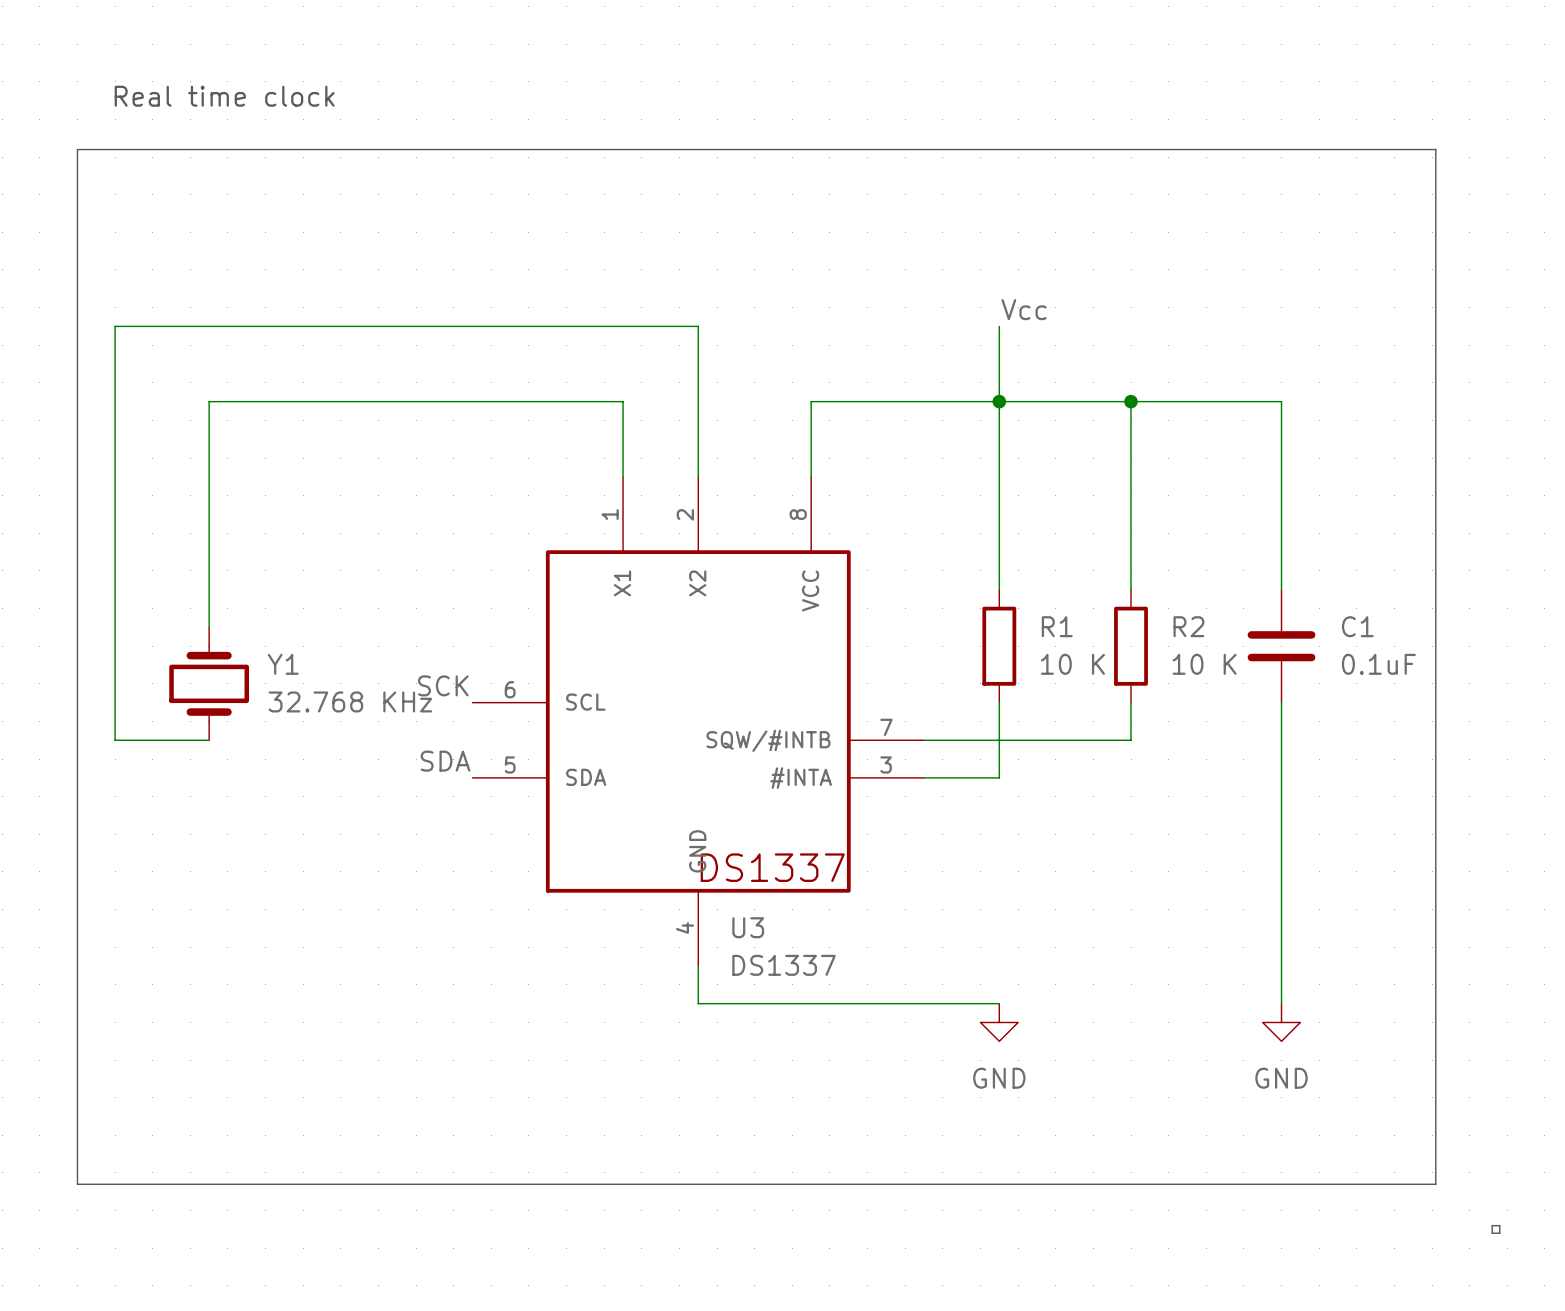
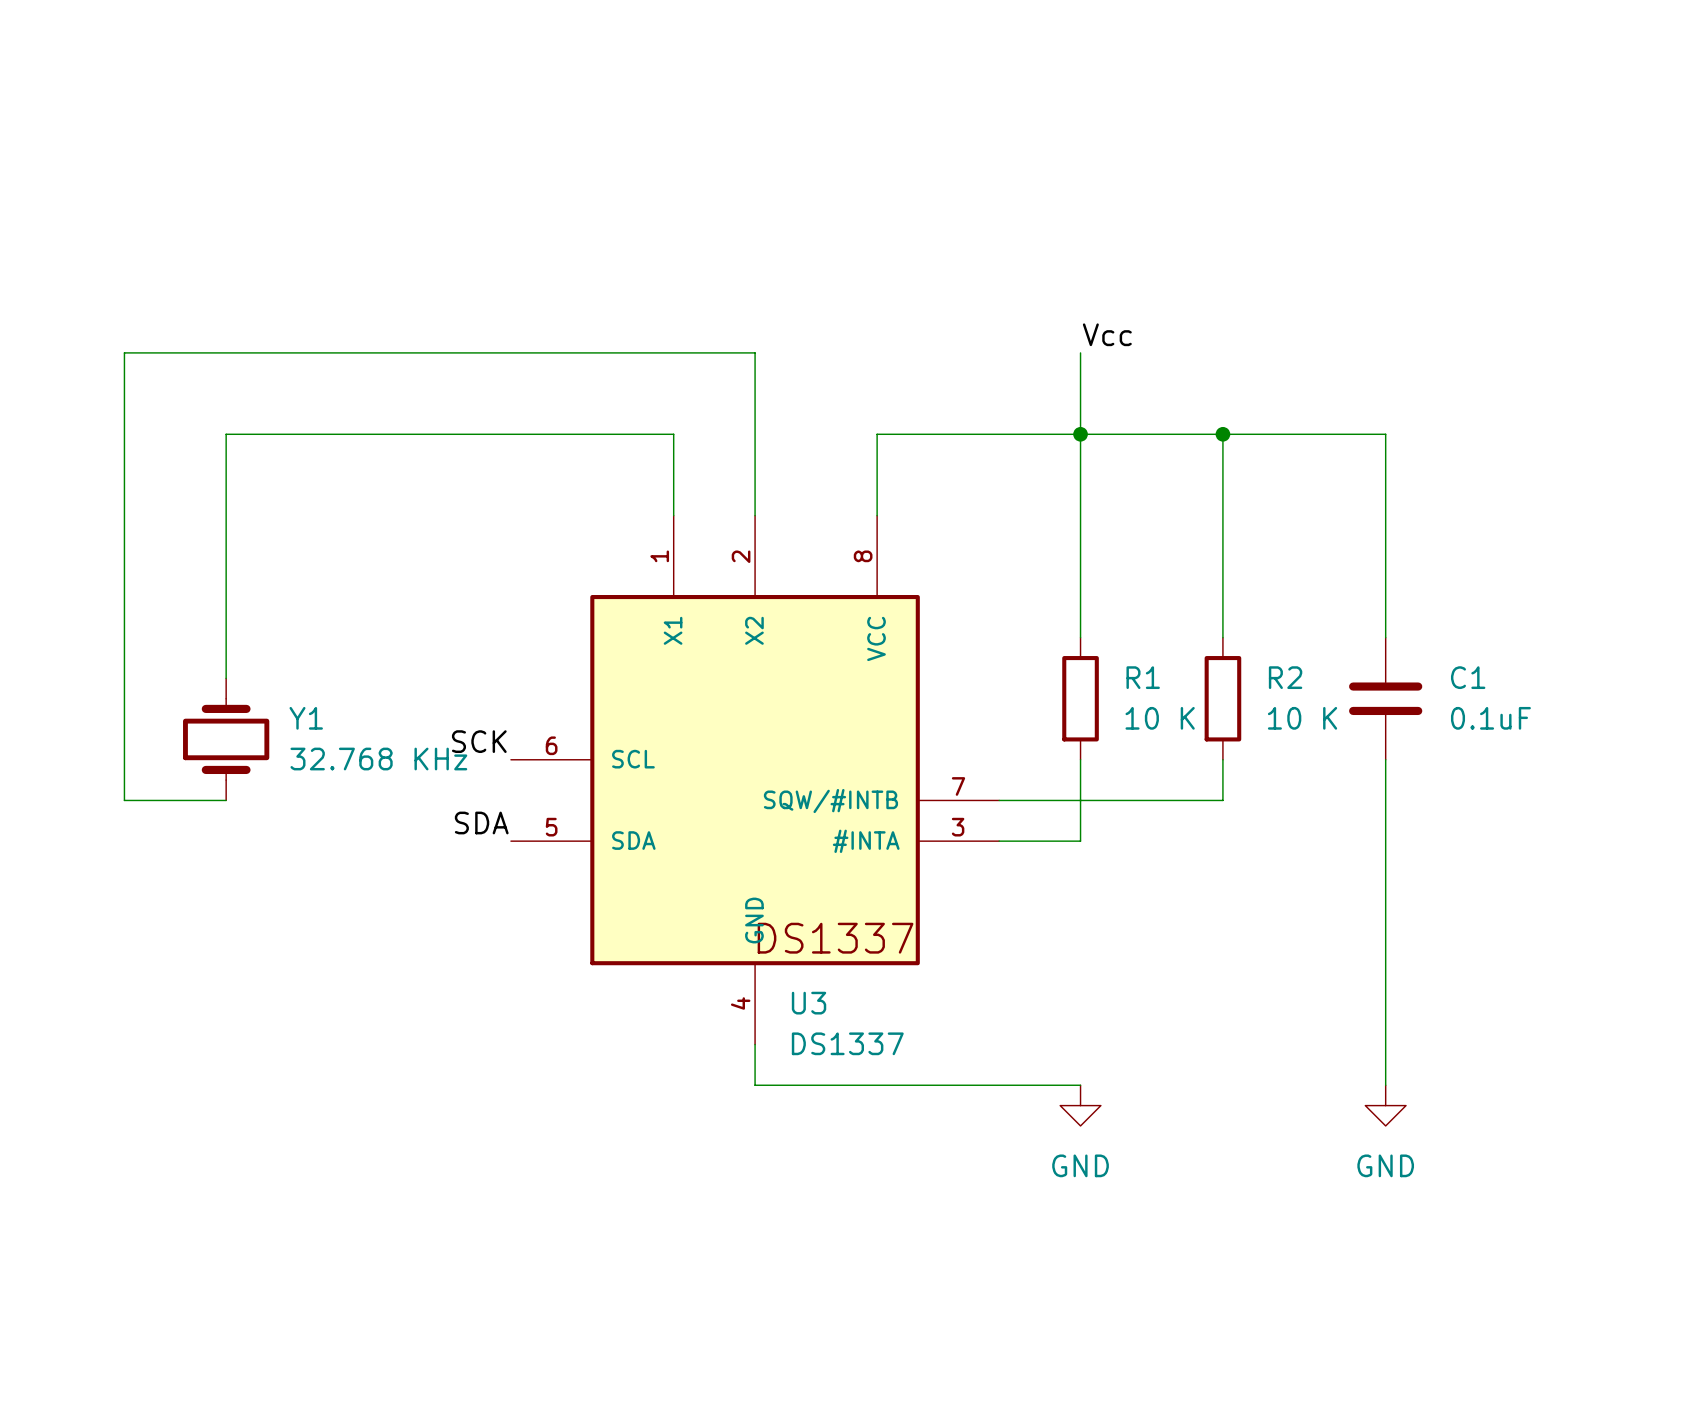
text: Real time clock (224, 96) -> none
line: (77, 149) (77, 1184) (1435, 1184) (1435, 149) (77, 149) -> none
line: (1492, 1225) (1499, 1225) (1499, 1233) (1492, 1233) (1492, 1225) -> none

